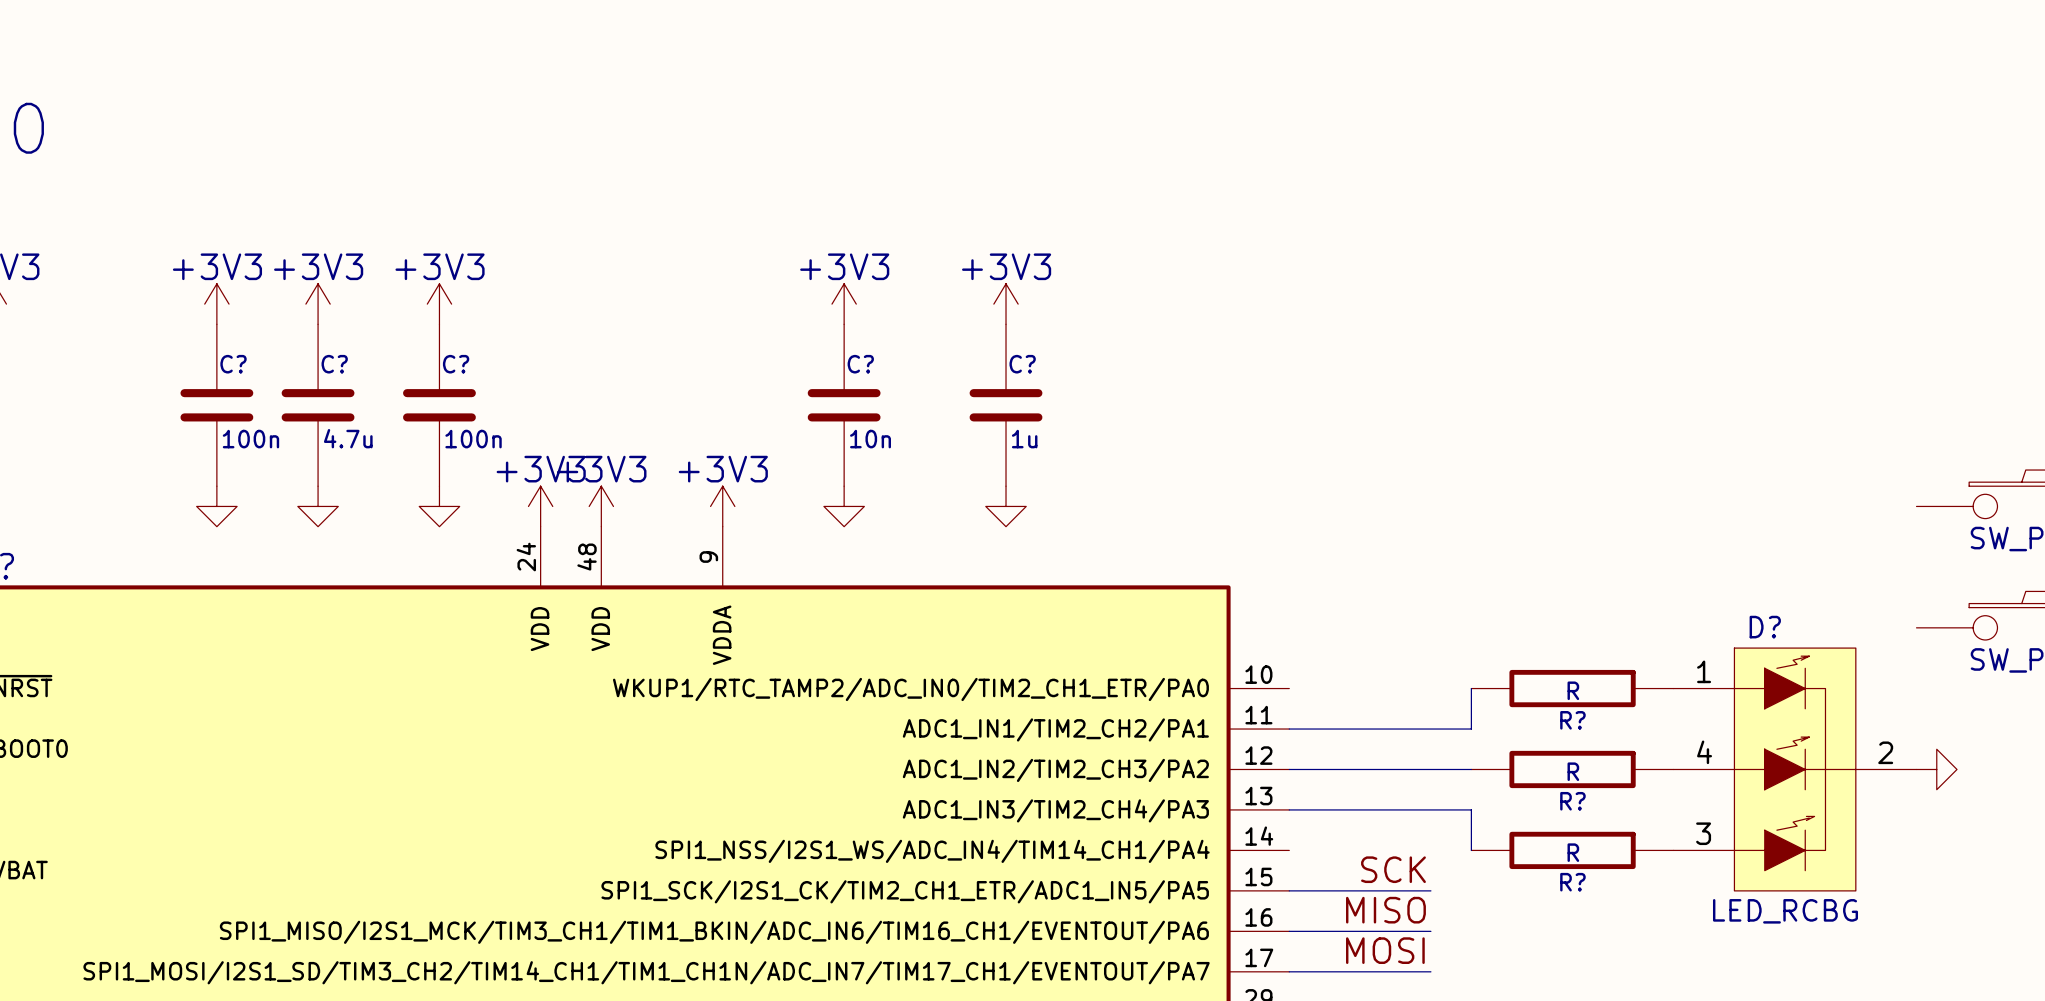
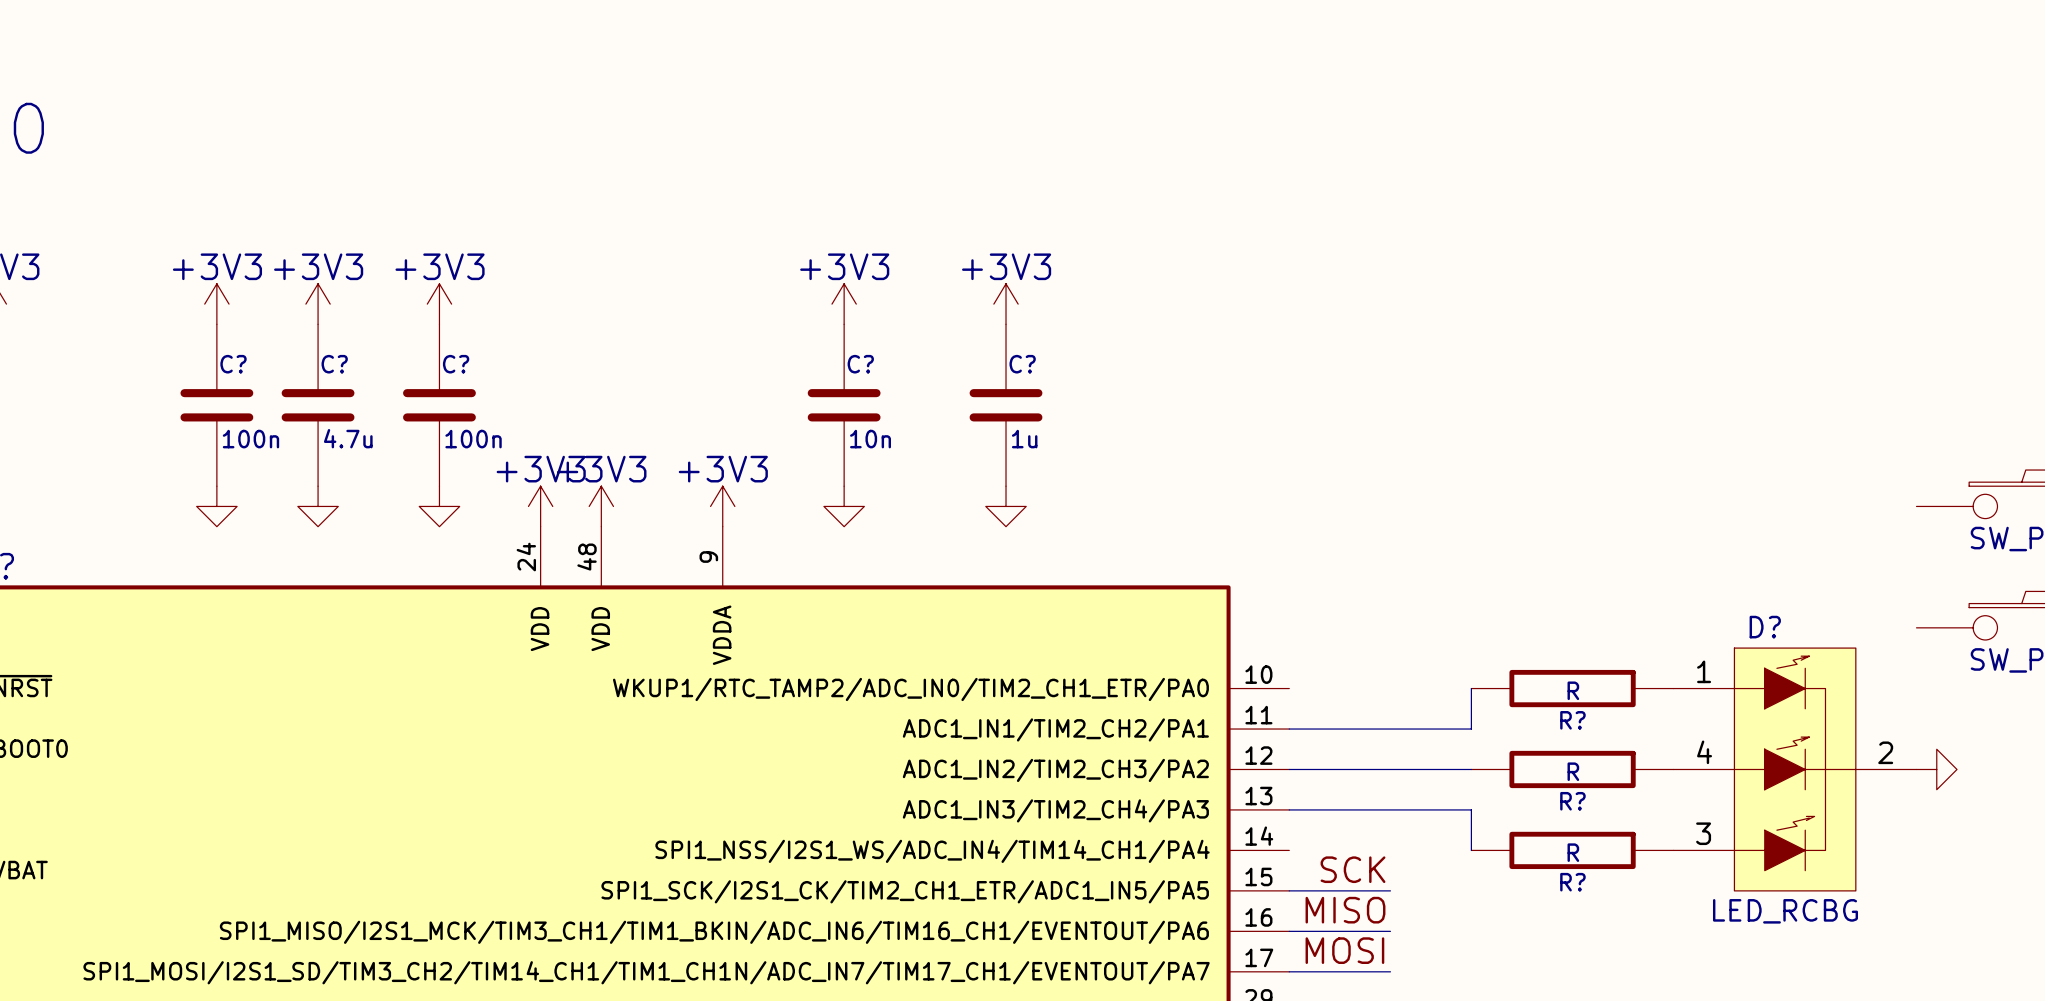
label position: SCK (1393, 869) -> SCK (1353, 869)
wire: (1390, 890) (1430, 890) -> none
label position: MISO (1385, 910) -> MISO (1345, 910)
wire: (1390, 931) (1430, 931) -> none
label position: MOSI (1385, 950) -> MOSI (1344, 950)
wire: (1390, 971) (1430, 971) -> none

